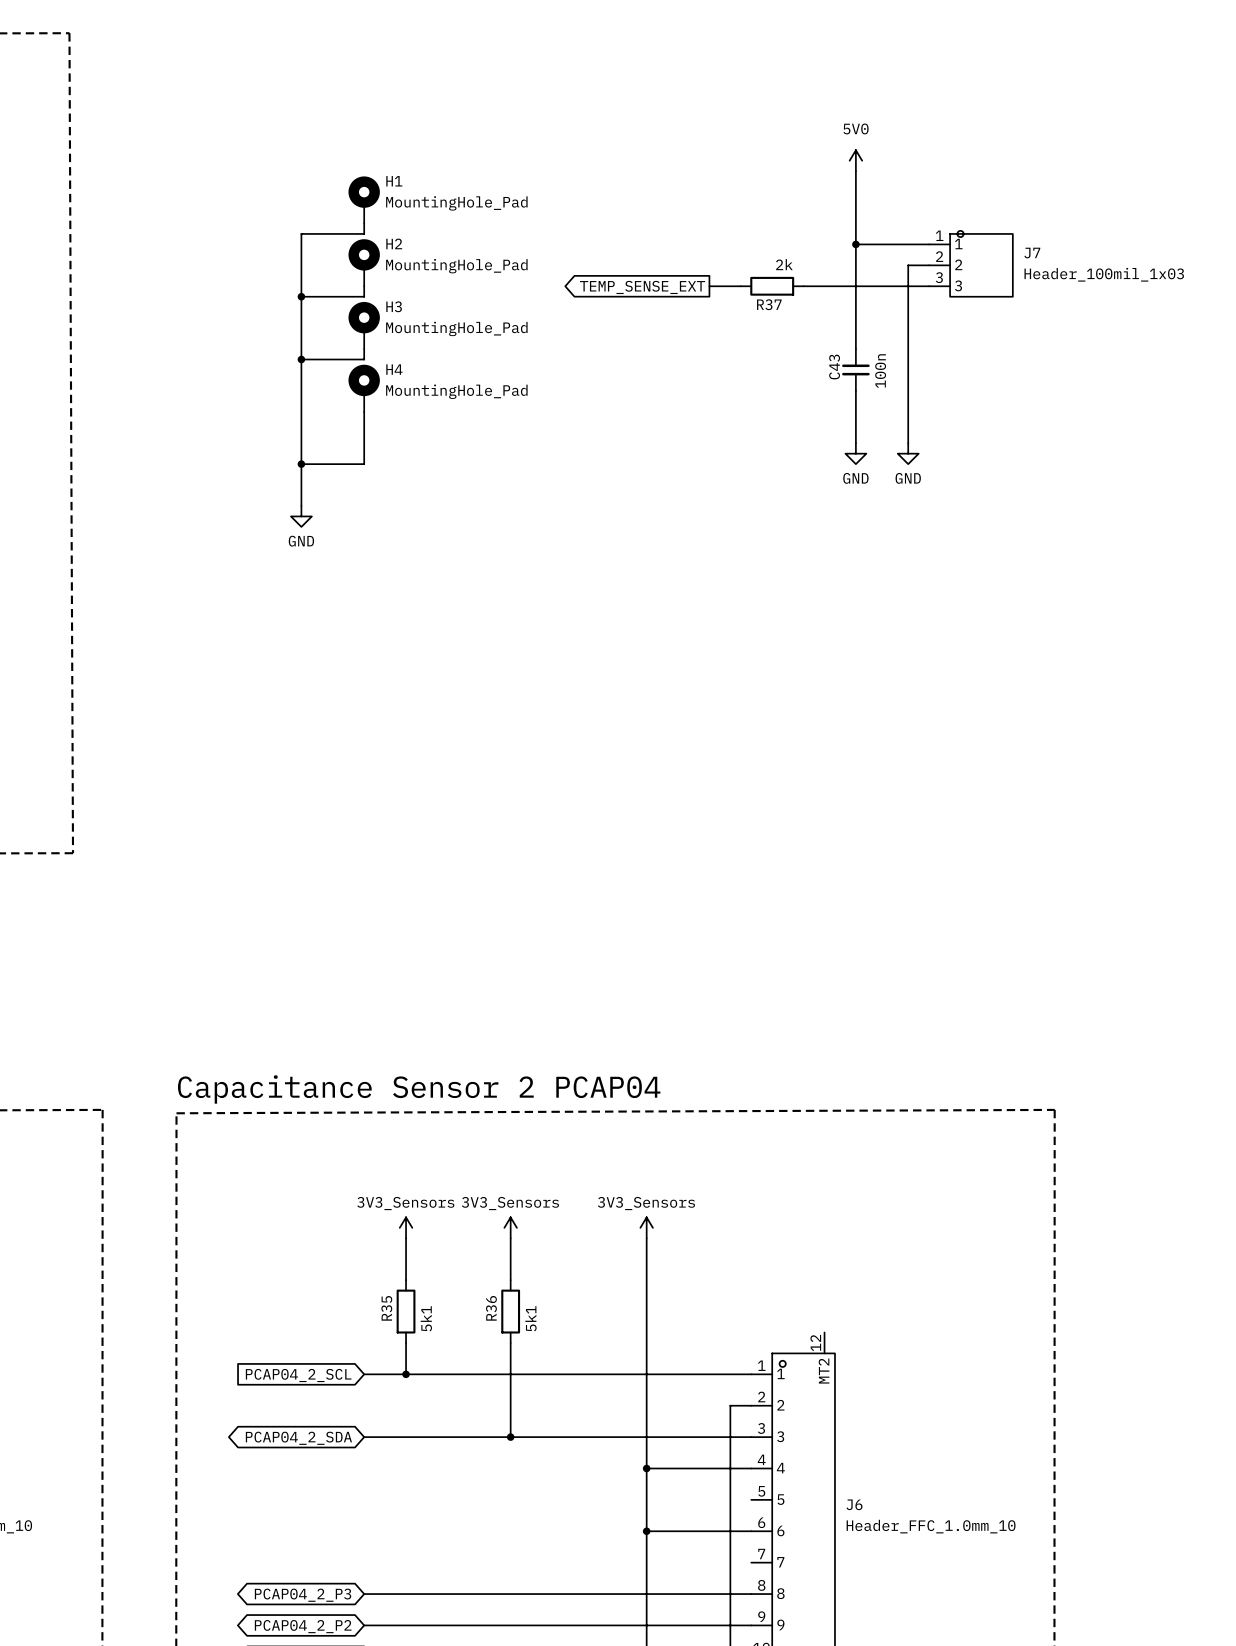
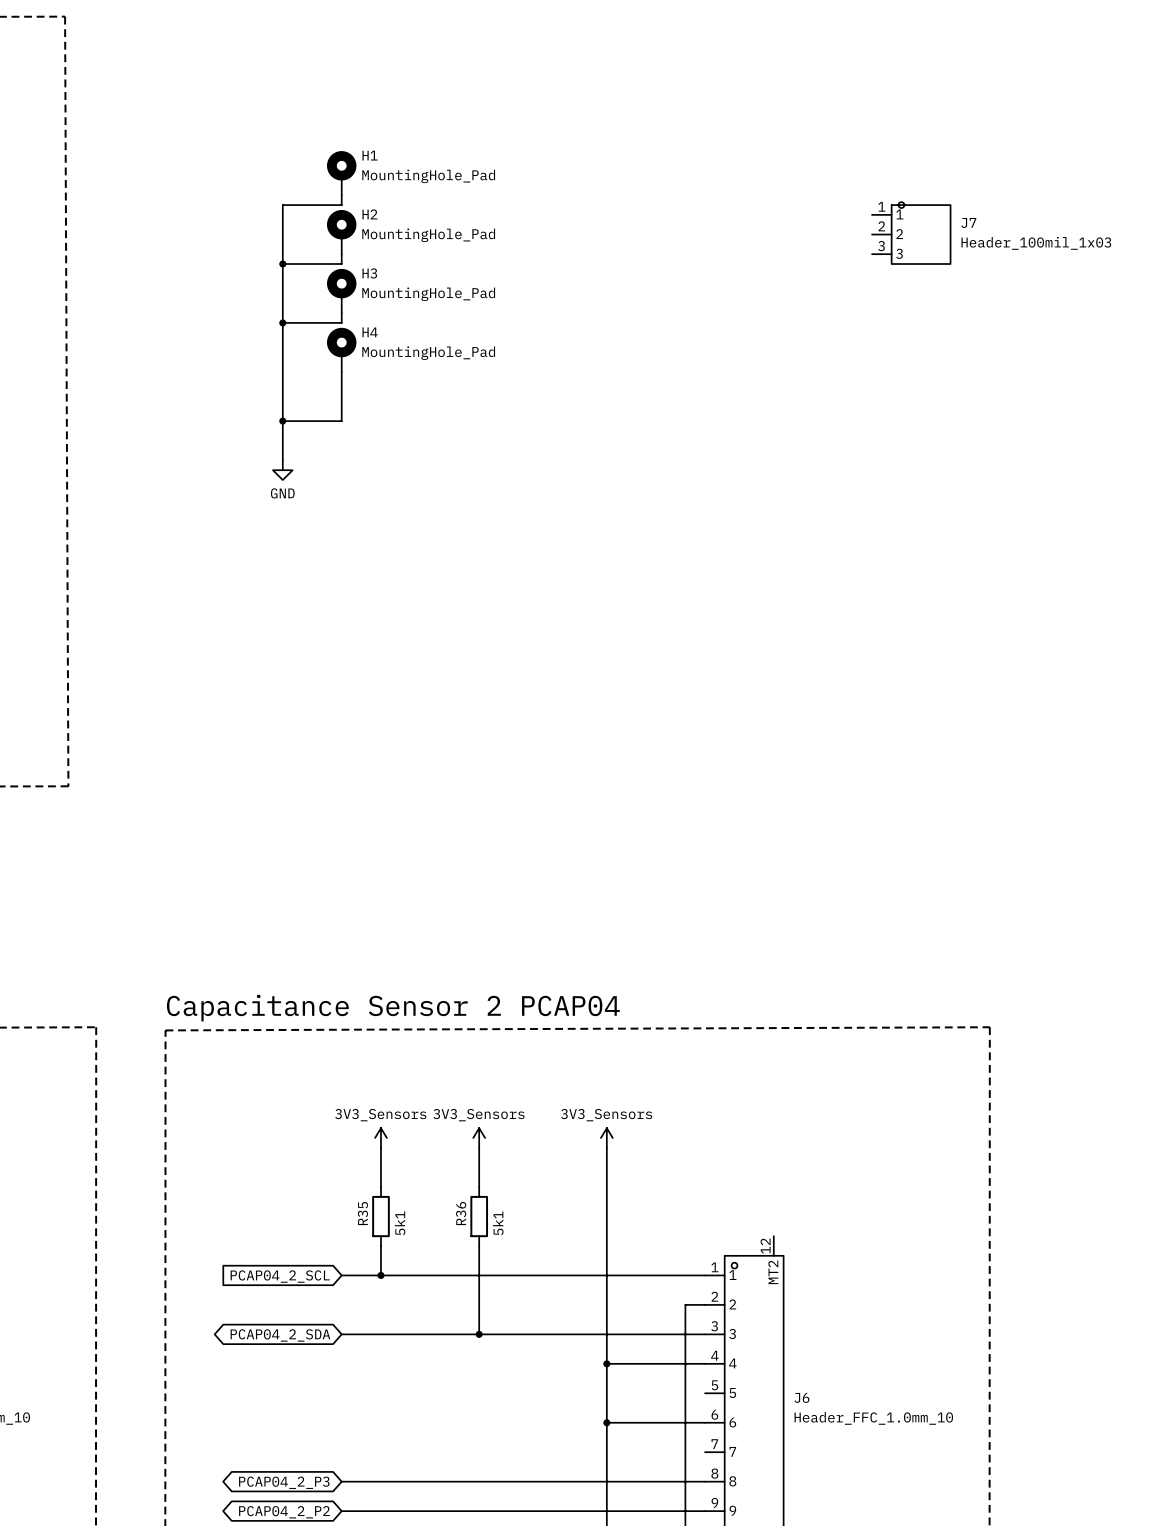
power symbol: 5V0 (855, 160) -> none
wire: (855, 171) (855, 349) -> none
wire: (855, 244) (929, 244) -> none
junction: (855, 244) -> none
wire: (929, 265) (908, 265) (908, 443) -> none
wire: (709, 286) (740, 286) -> none
R37: 2k (772, 286) -> none
wire: (803, 286) (929, 286) -> none
global label: TEMP_SENSE_EXT (642, 287) -> none
C43: 100n (855, 369) -> none
wire: (855, 390) (855, 443) -> none
power symbol: GND (855, 453) -> none
power symbol: GND (908, 453) -> none

